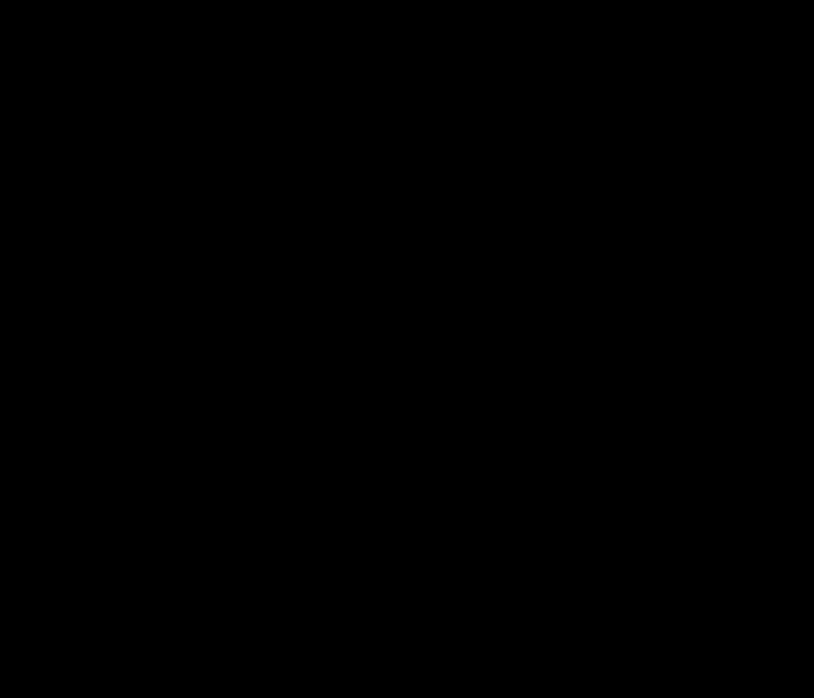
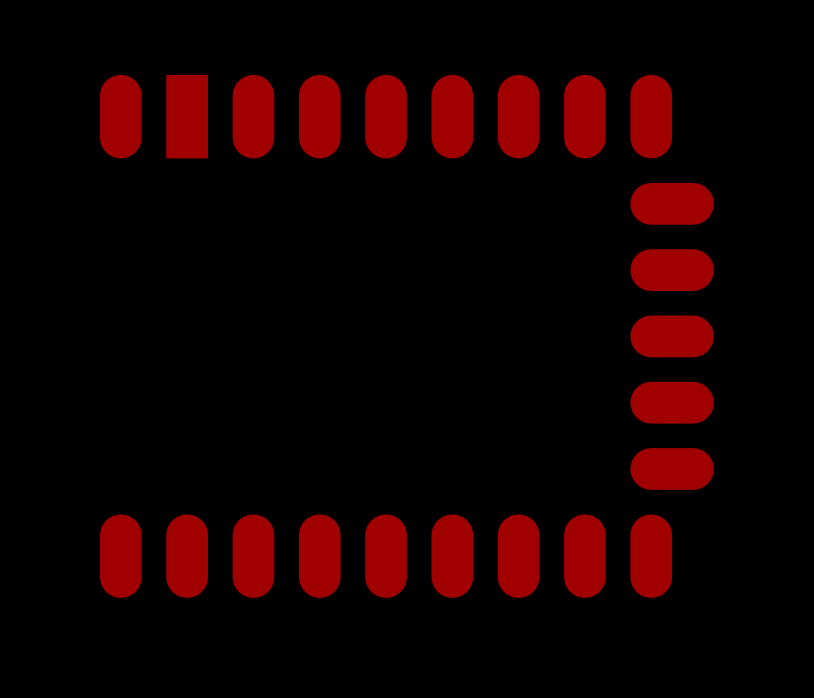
part: none -> (406, 336)

